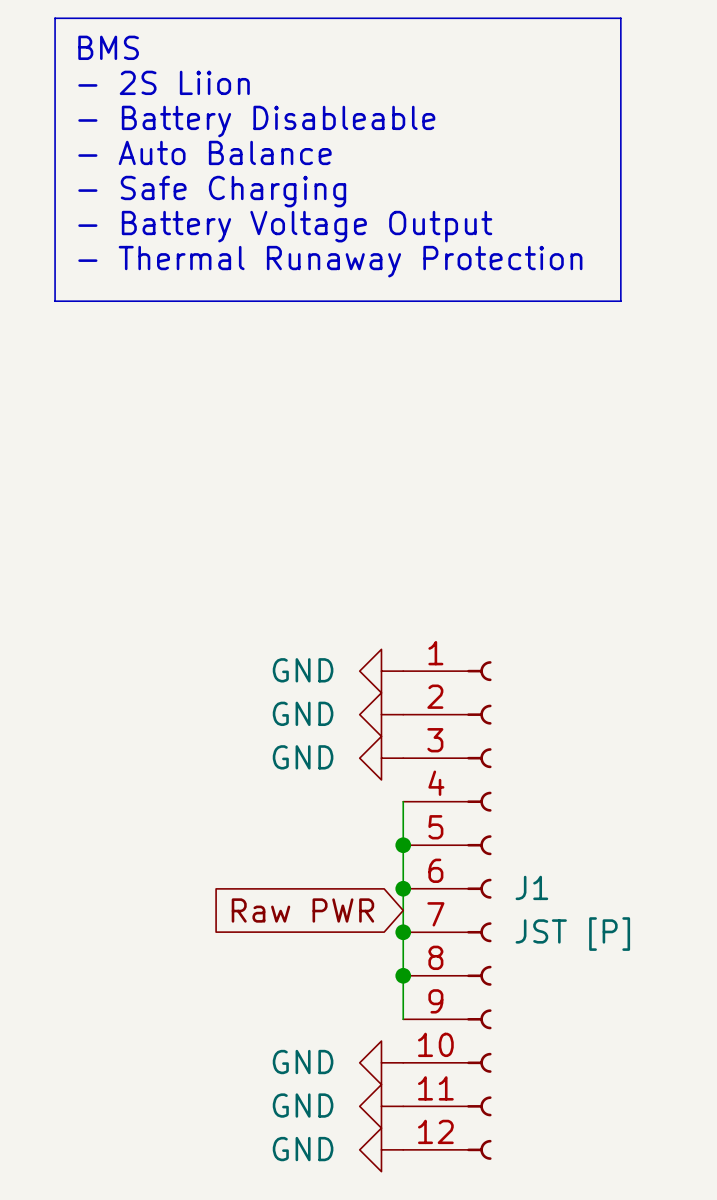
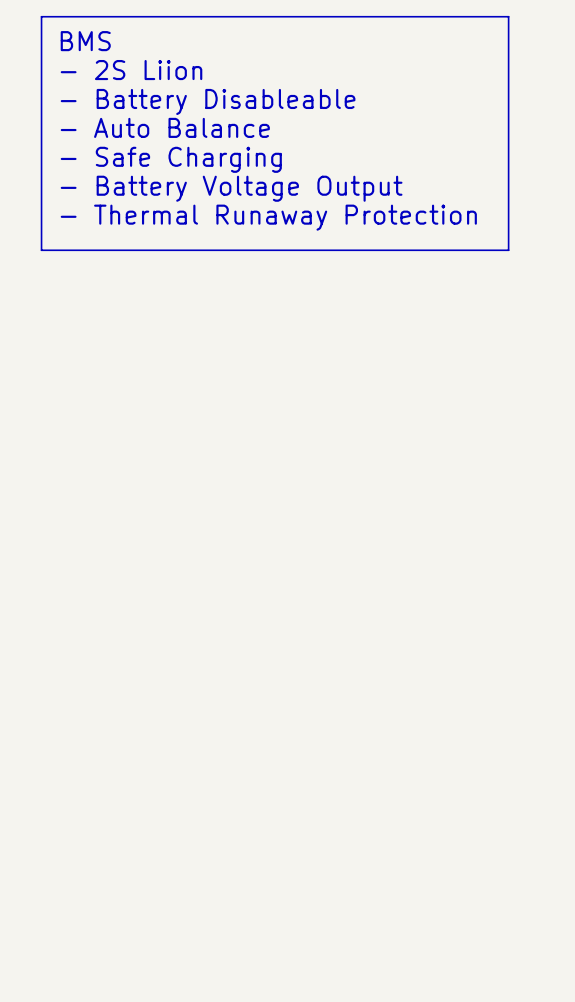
power symbol: GND (381, 671) -> none
power symbol: GND (381, 714) -> none
power symbol: GND (381, 758) -> none
wire: (403, 801) (403, 1019) -> none
junction: (403, 845) -> none
junction: (403, 888) -> none
global label: Raw PWR (302, 910) -> none
J1: JST [P] (447, 910) -> none
junction: (403, 932) -> none
junction: (403, 975) -> none
power symbol: GND (381, 1062) -> none
power symbol: GND (381, 1106) -> none
power symbol: GND (381, 1149) -> none

